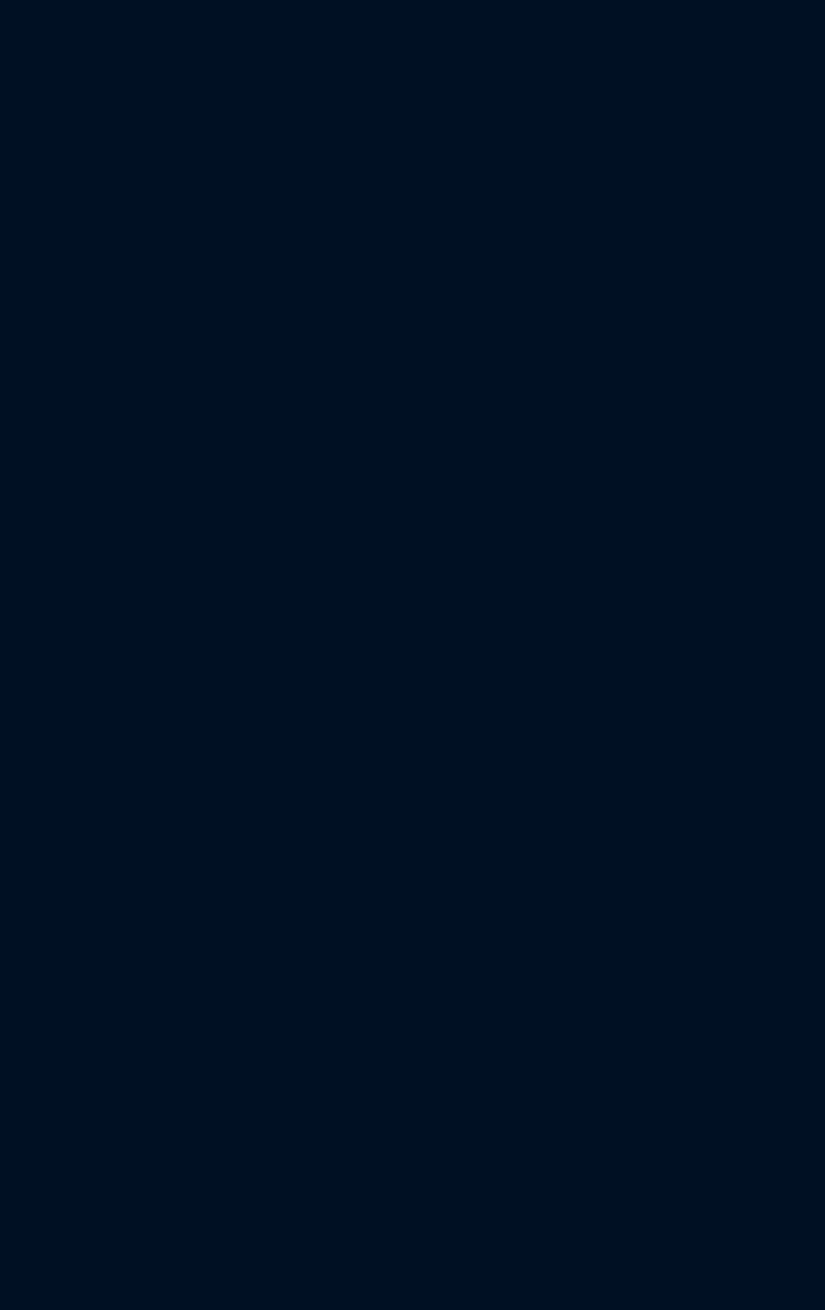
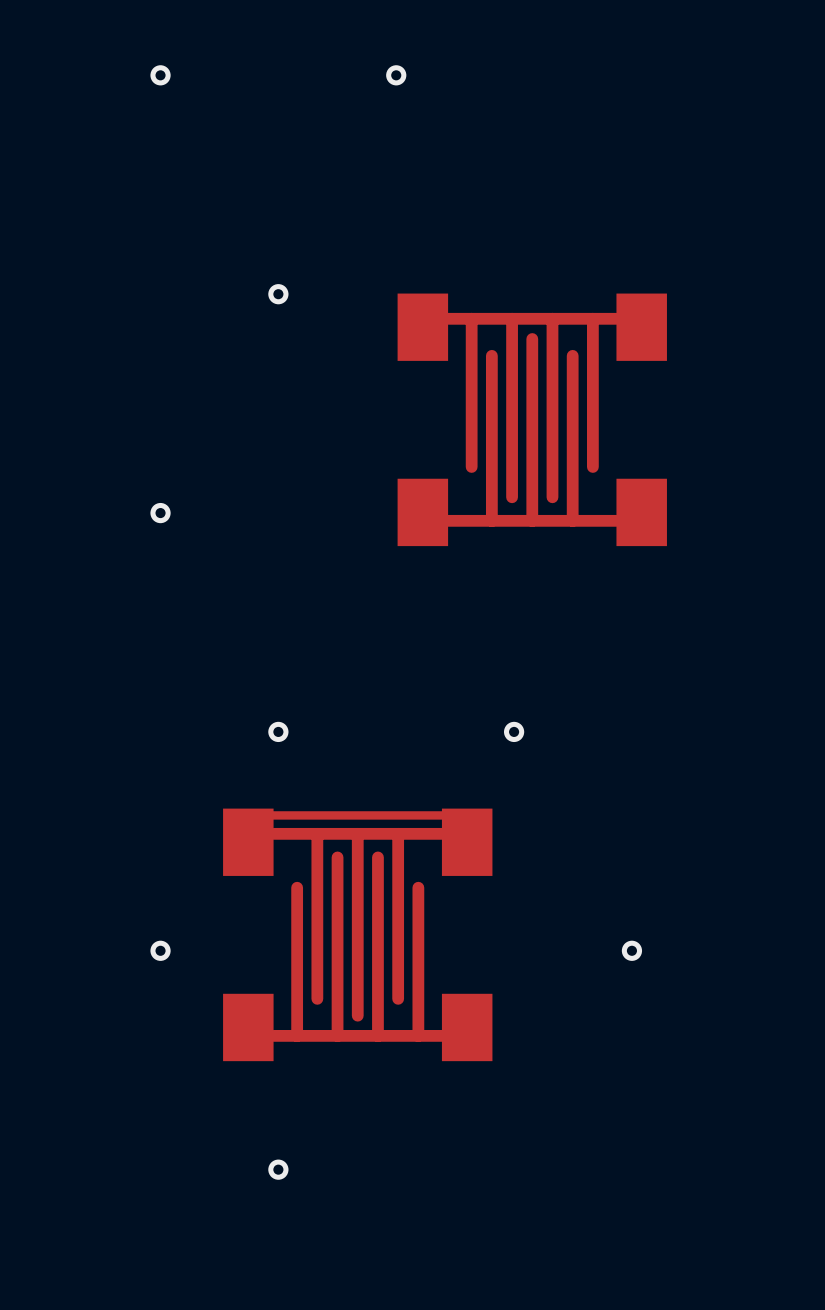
via: none -> (160, 75)
via: none -> (396, 75)
via: none -> (278, 294)
part: none -> (532, 419)
via: none -> (160, 513)
via: none -> (278, 731)
via: none -> (514, 731)
top track: none -> (467, 842) (457, 815) (258, 815) (248, 842)
part: none -> (357, 934)
via: none -> (160, 950)
via: none -> (631, 950)
via: none -> (278, 1169)

